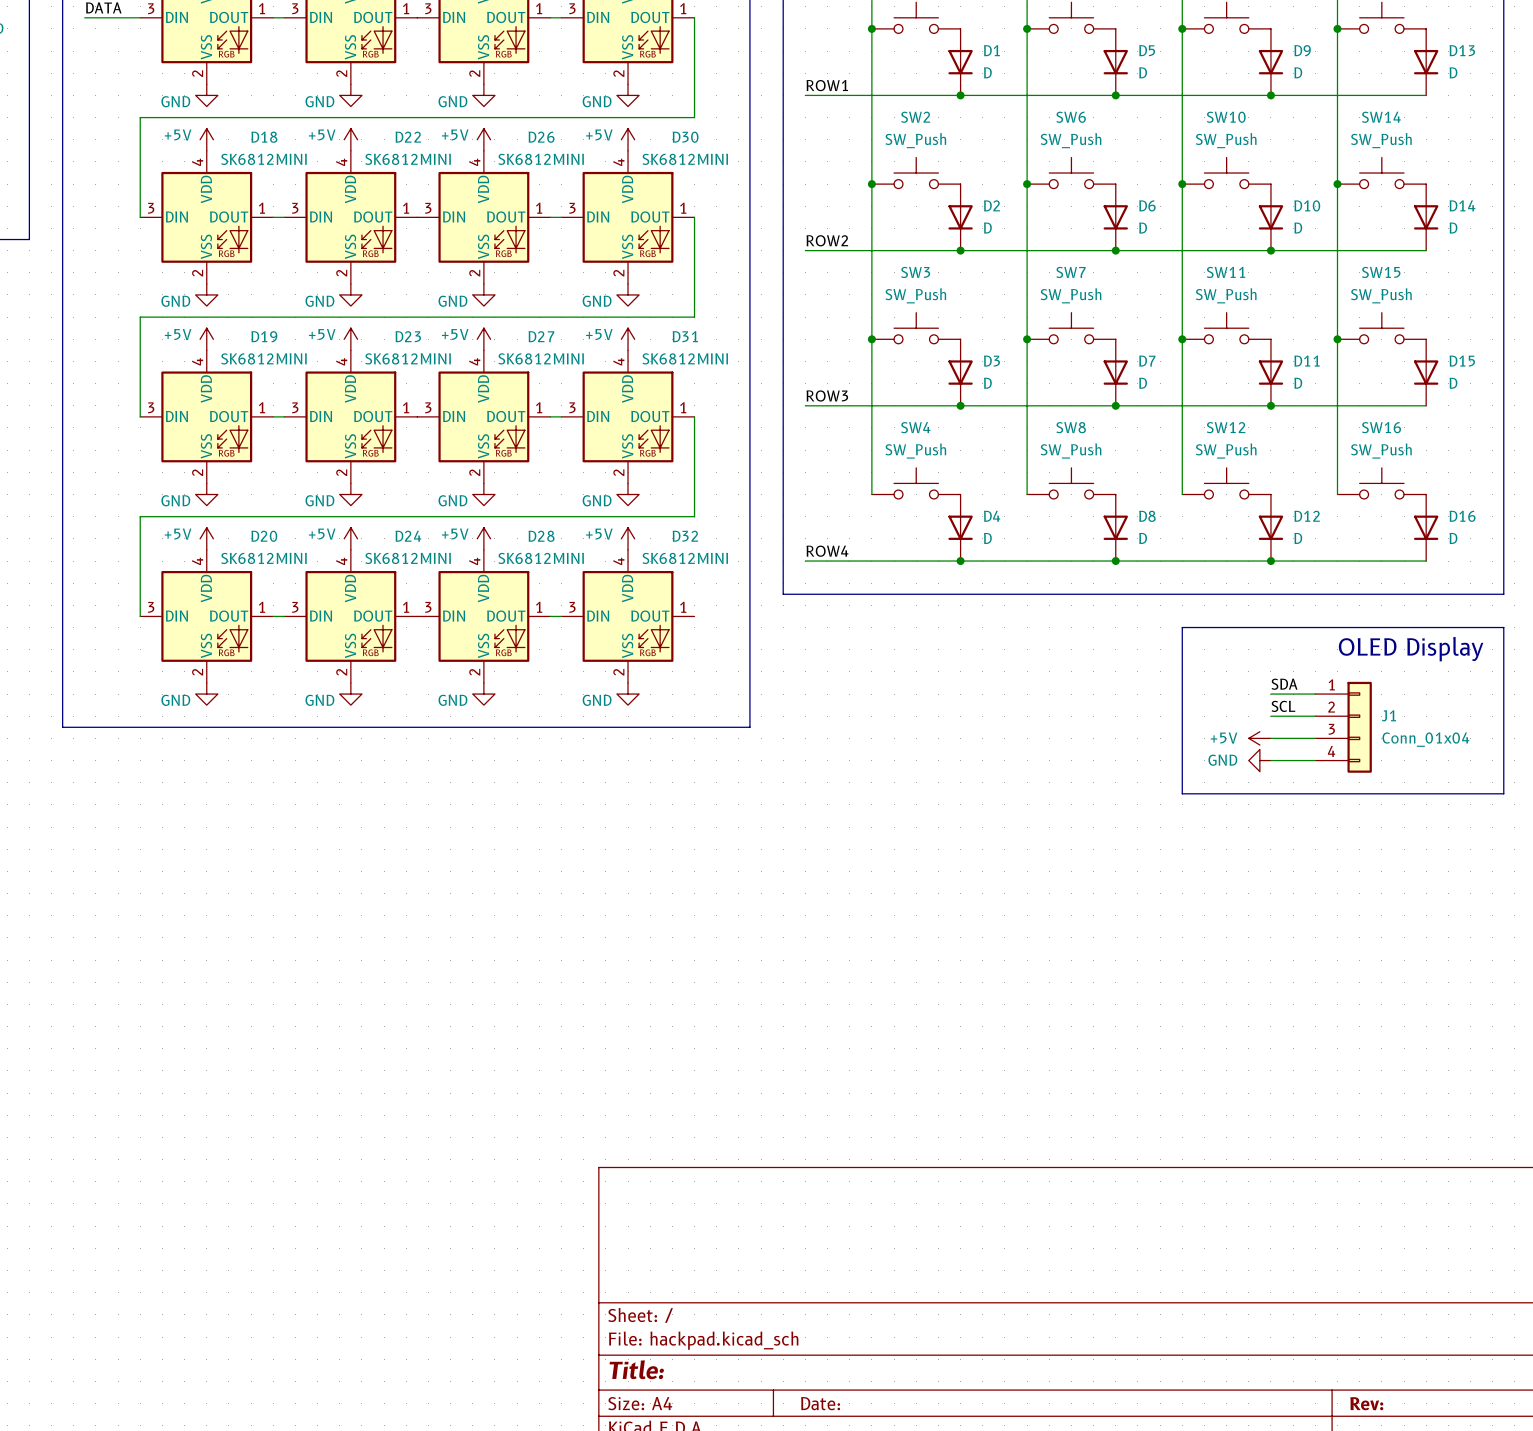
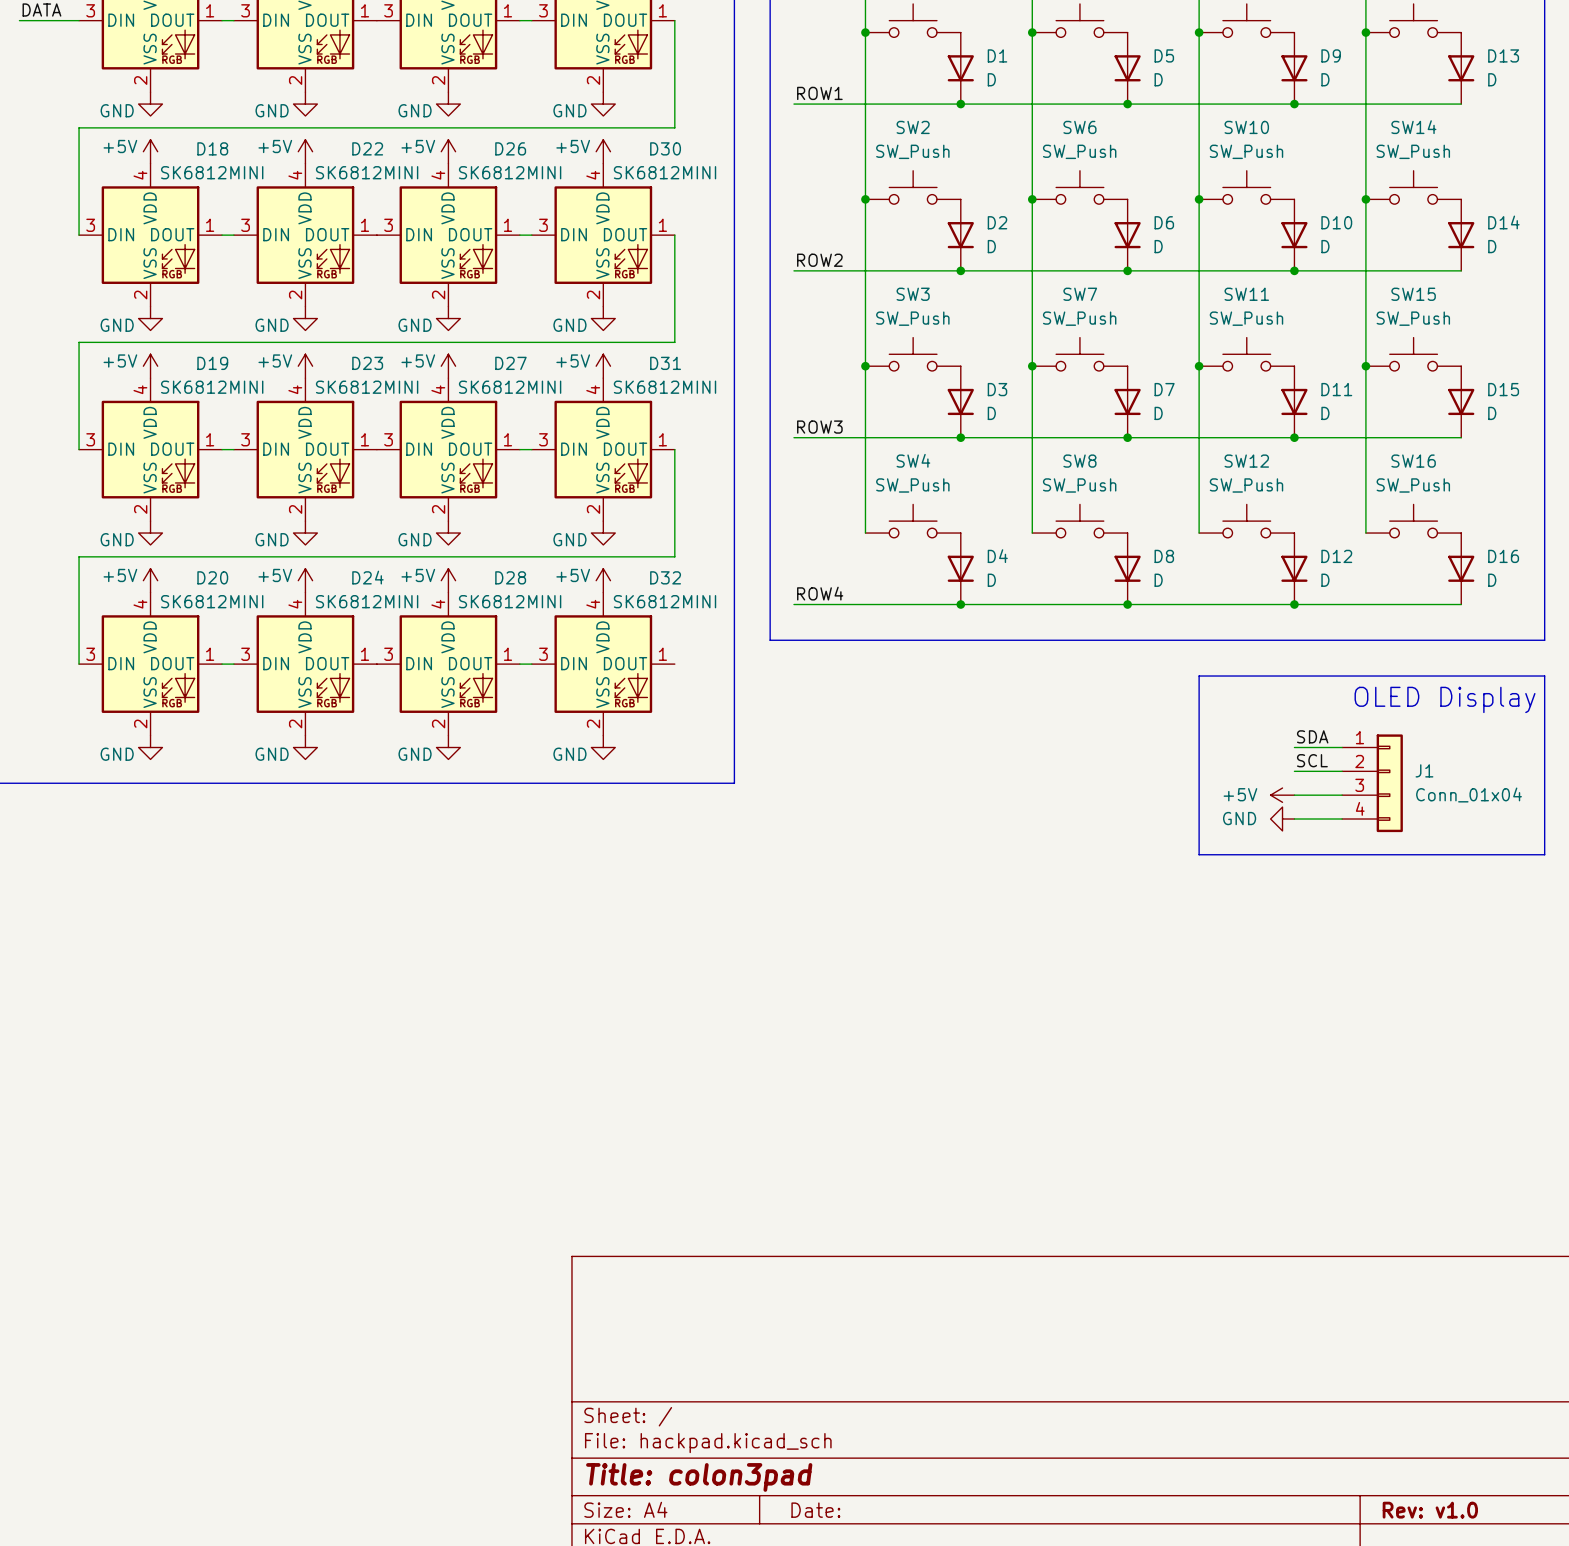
title block: Title: (636, 1369) -> Title: colon3pad (699, 1477)
title block: Rev: (1366, 1403) -> Rev: v1.0 (1430, 1510)

